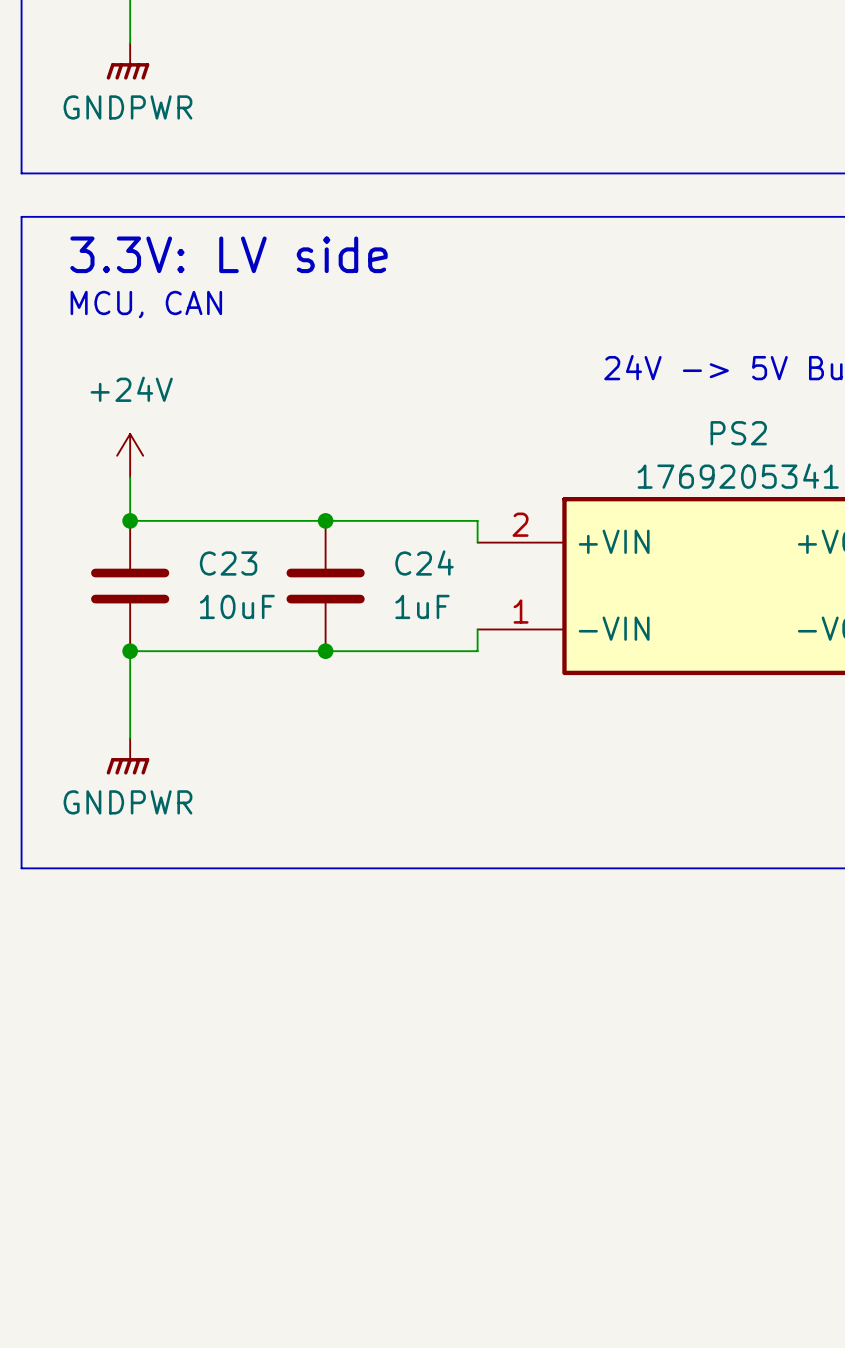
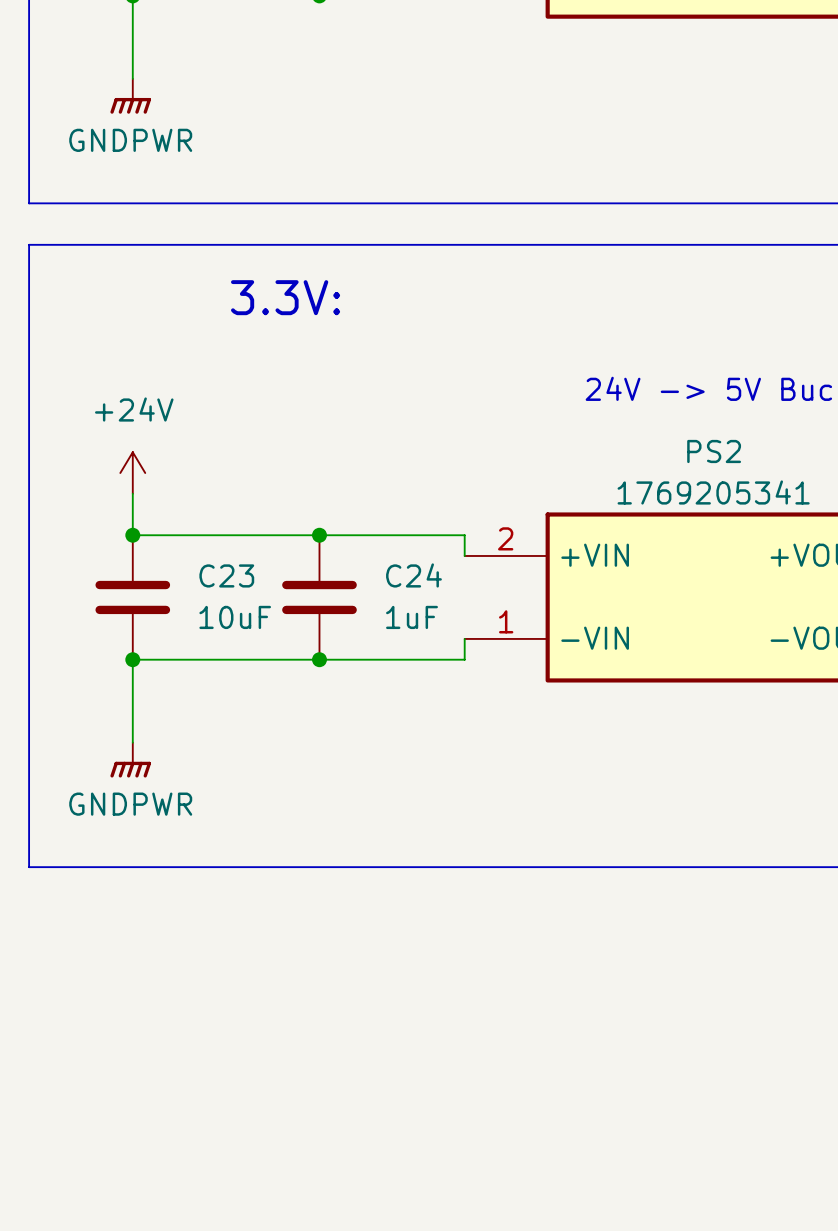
text: 3.3V: LV side (229, 254) -> none
text: none -> 3.3V: (285, 297)
text: MCU, CAN (146, 304) -> none

